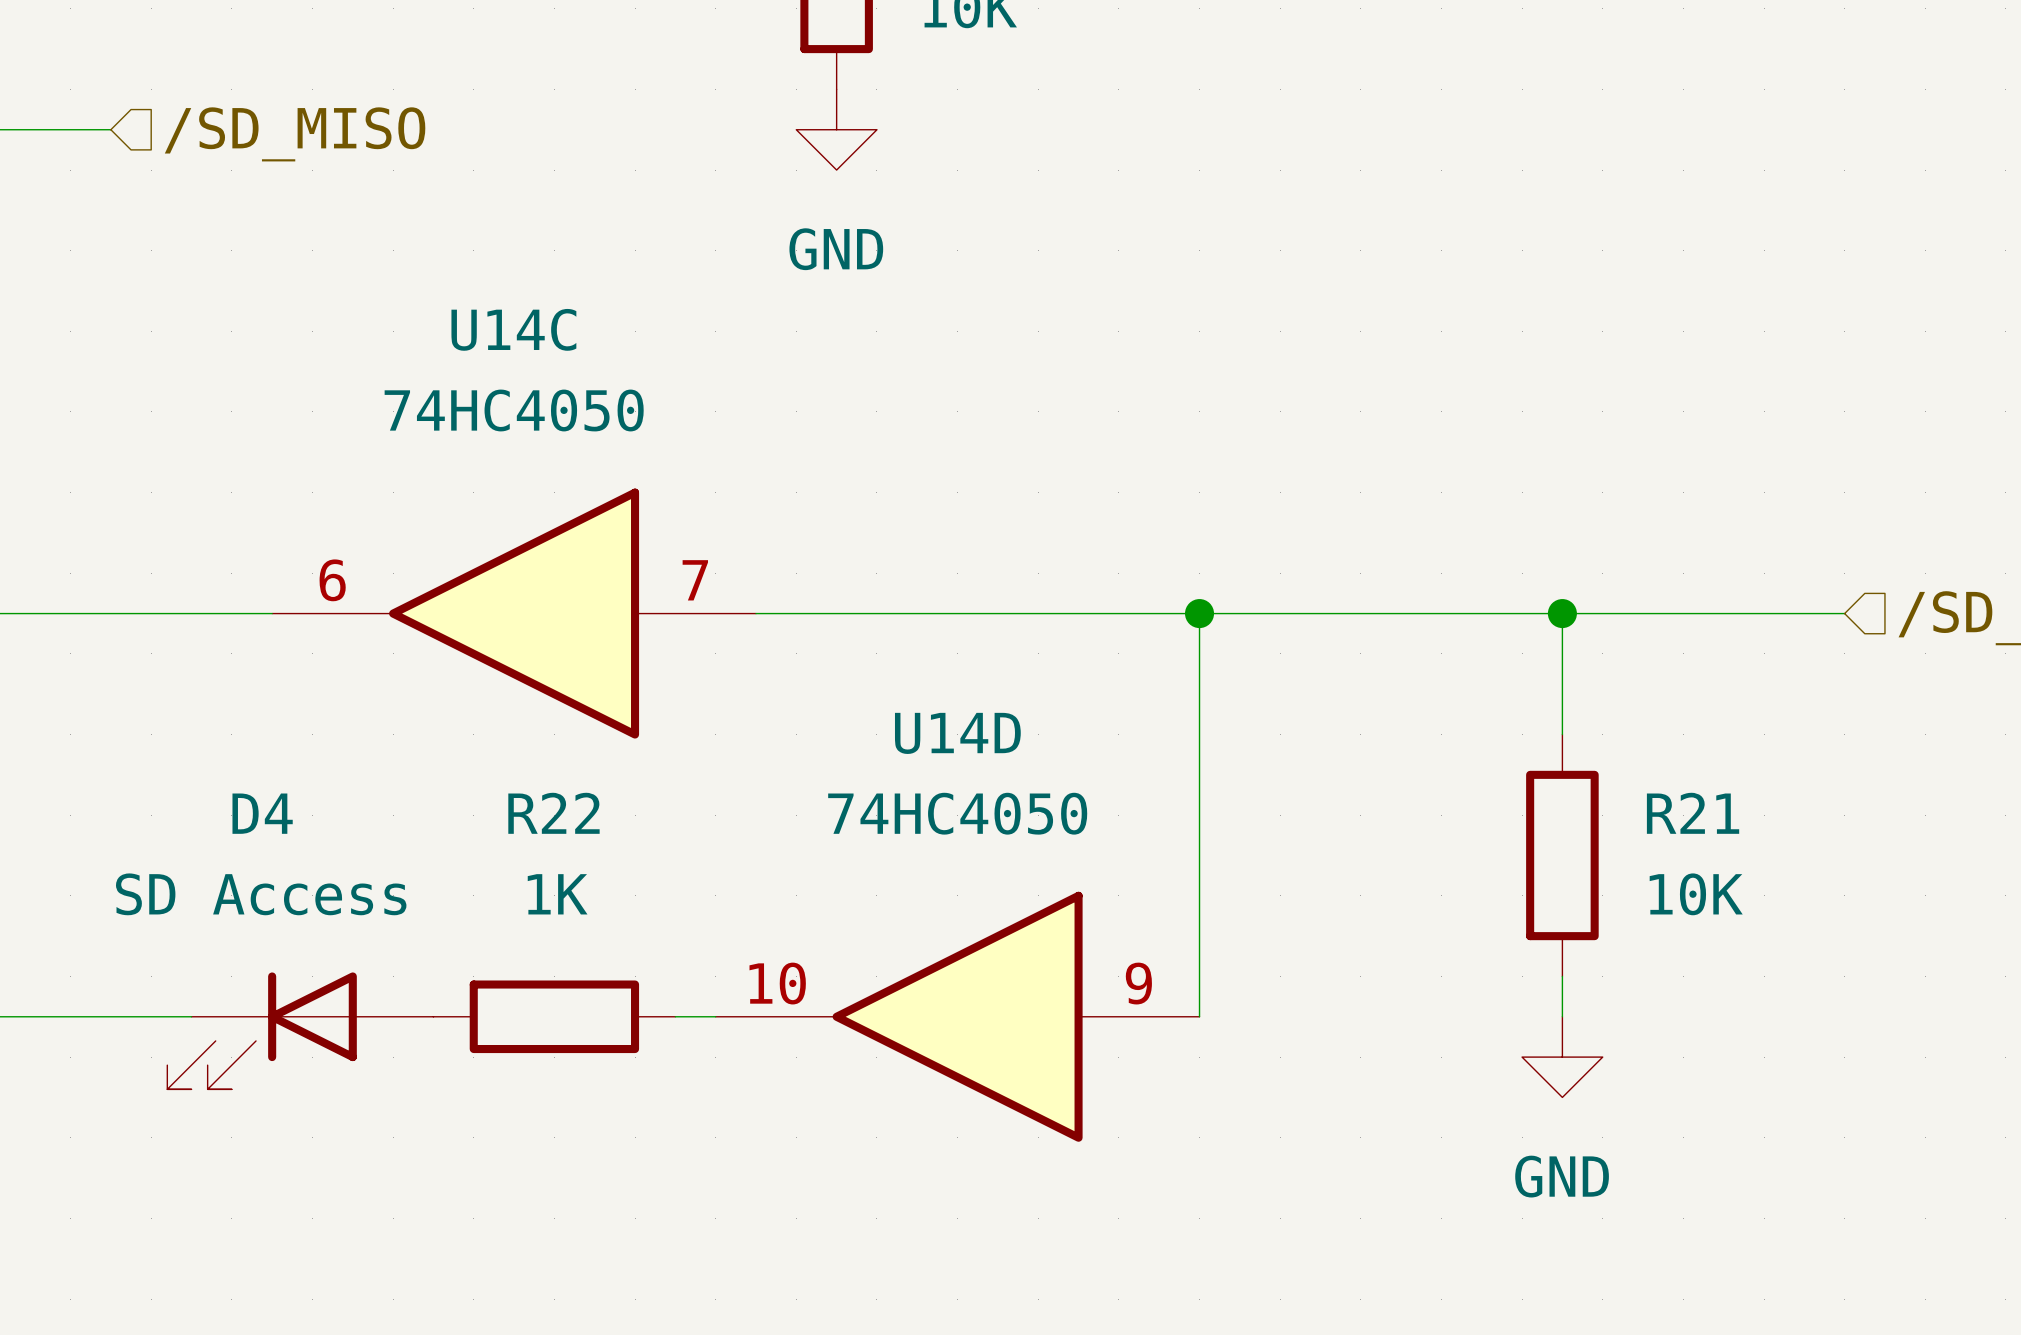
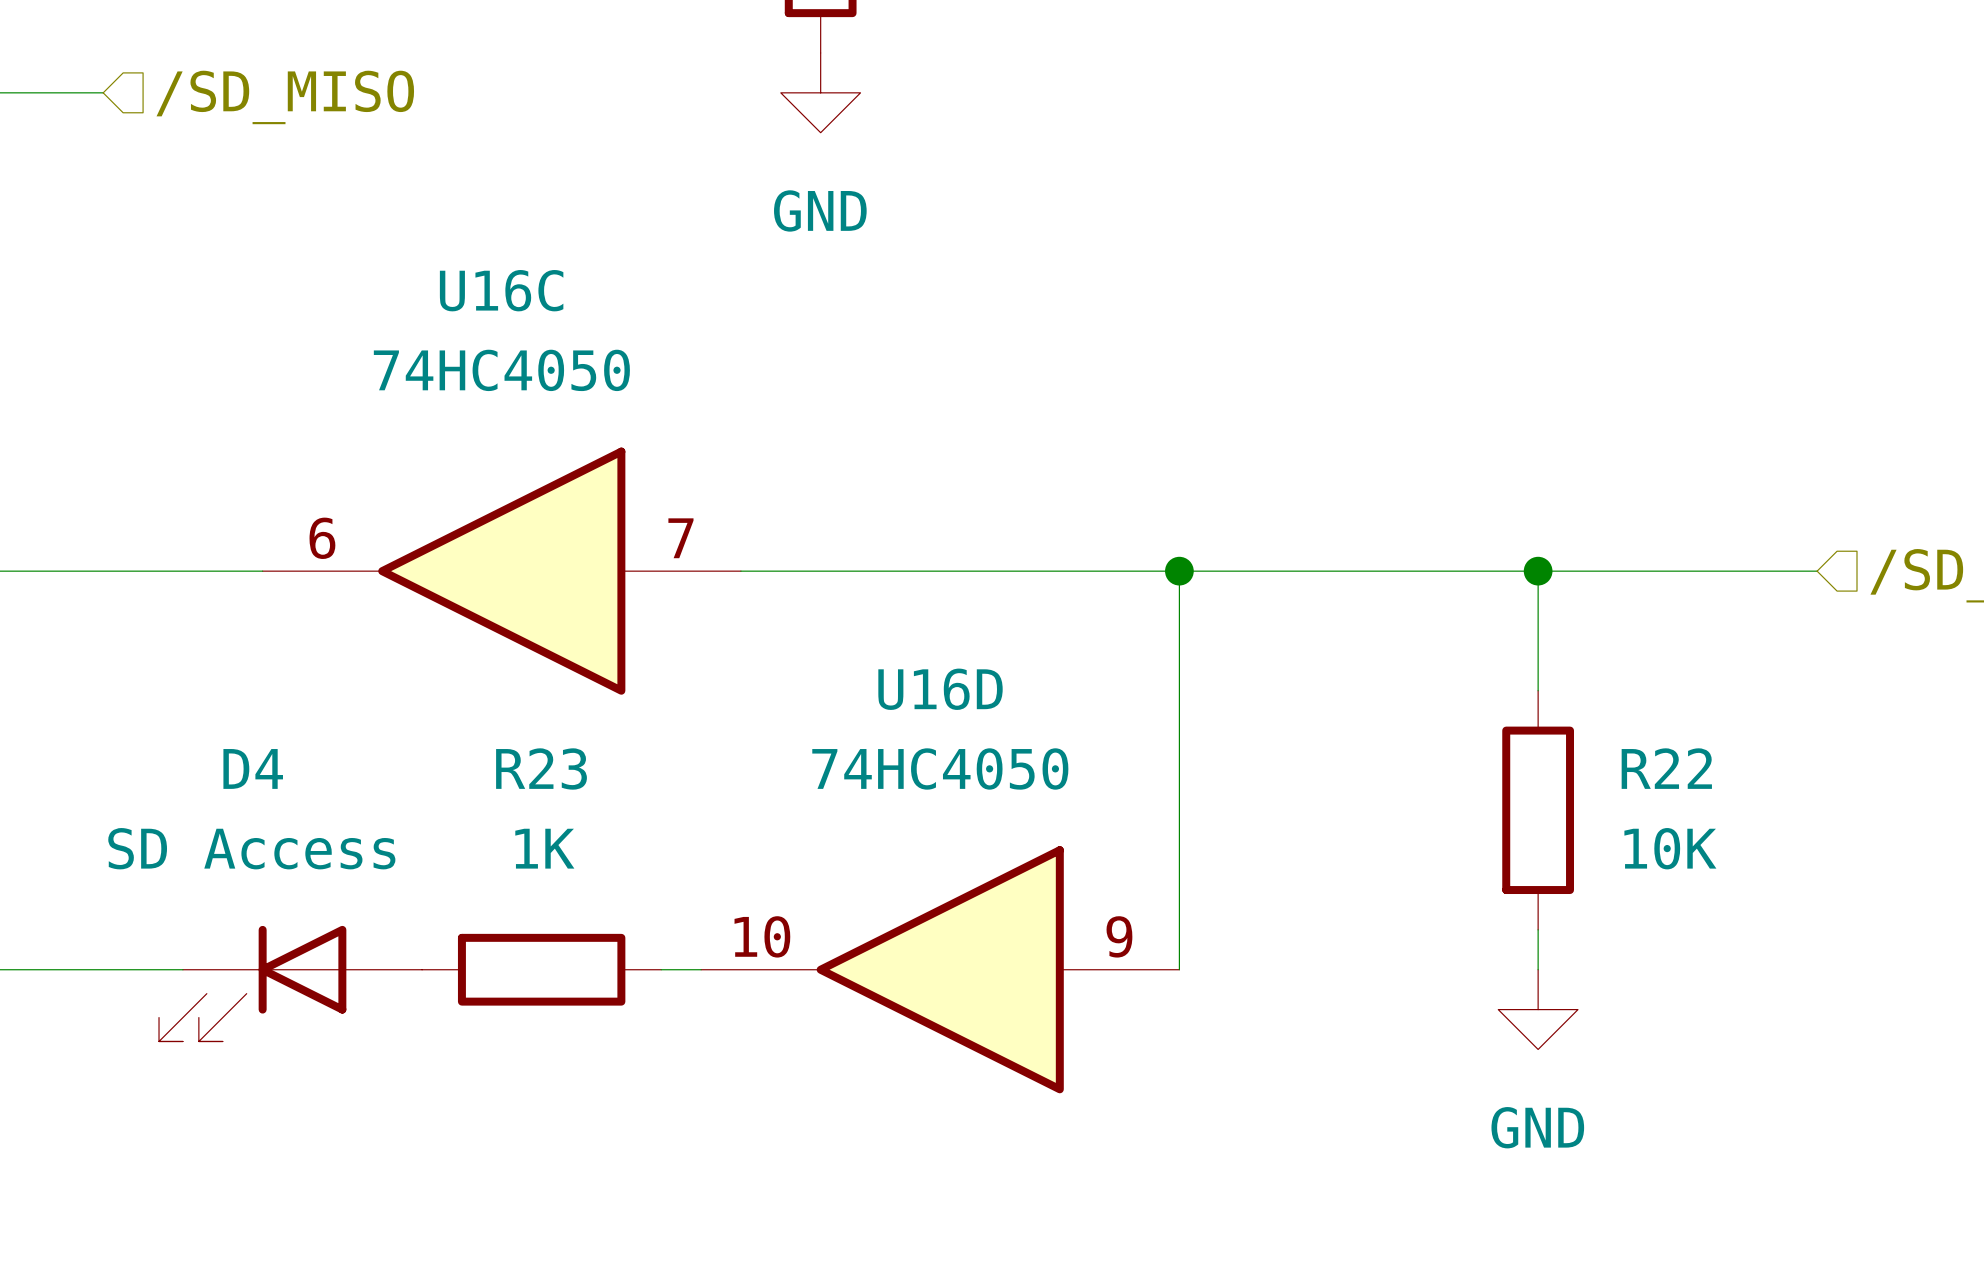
U14C name: U14C (513, 329) -> U16C (501, 290)
U14D name: U14D (957, 733) -> U16D (940, 689)
R22 name: R22 (553, 813) -> R23 (541, 768)
R21 name: R21 (1693, 813) -> R22 (1666, 768)

